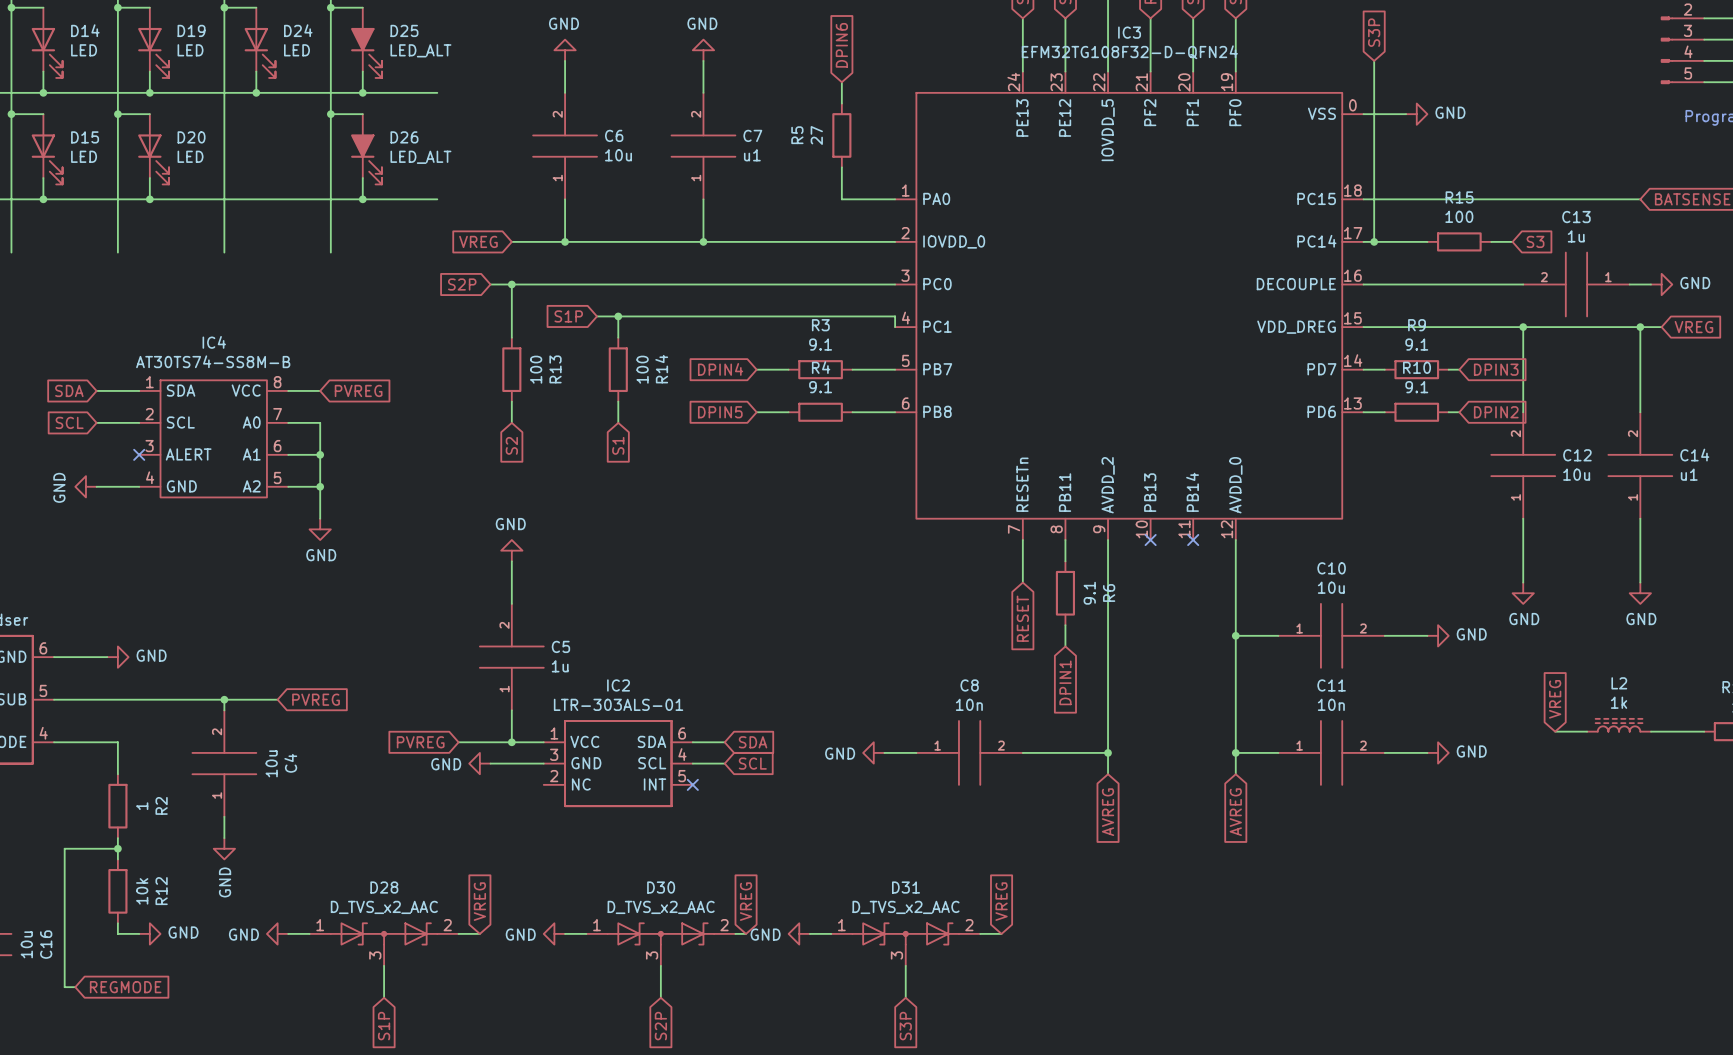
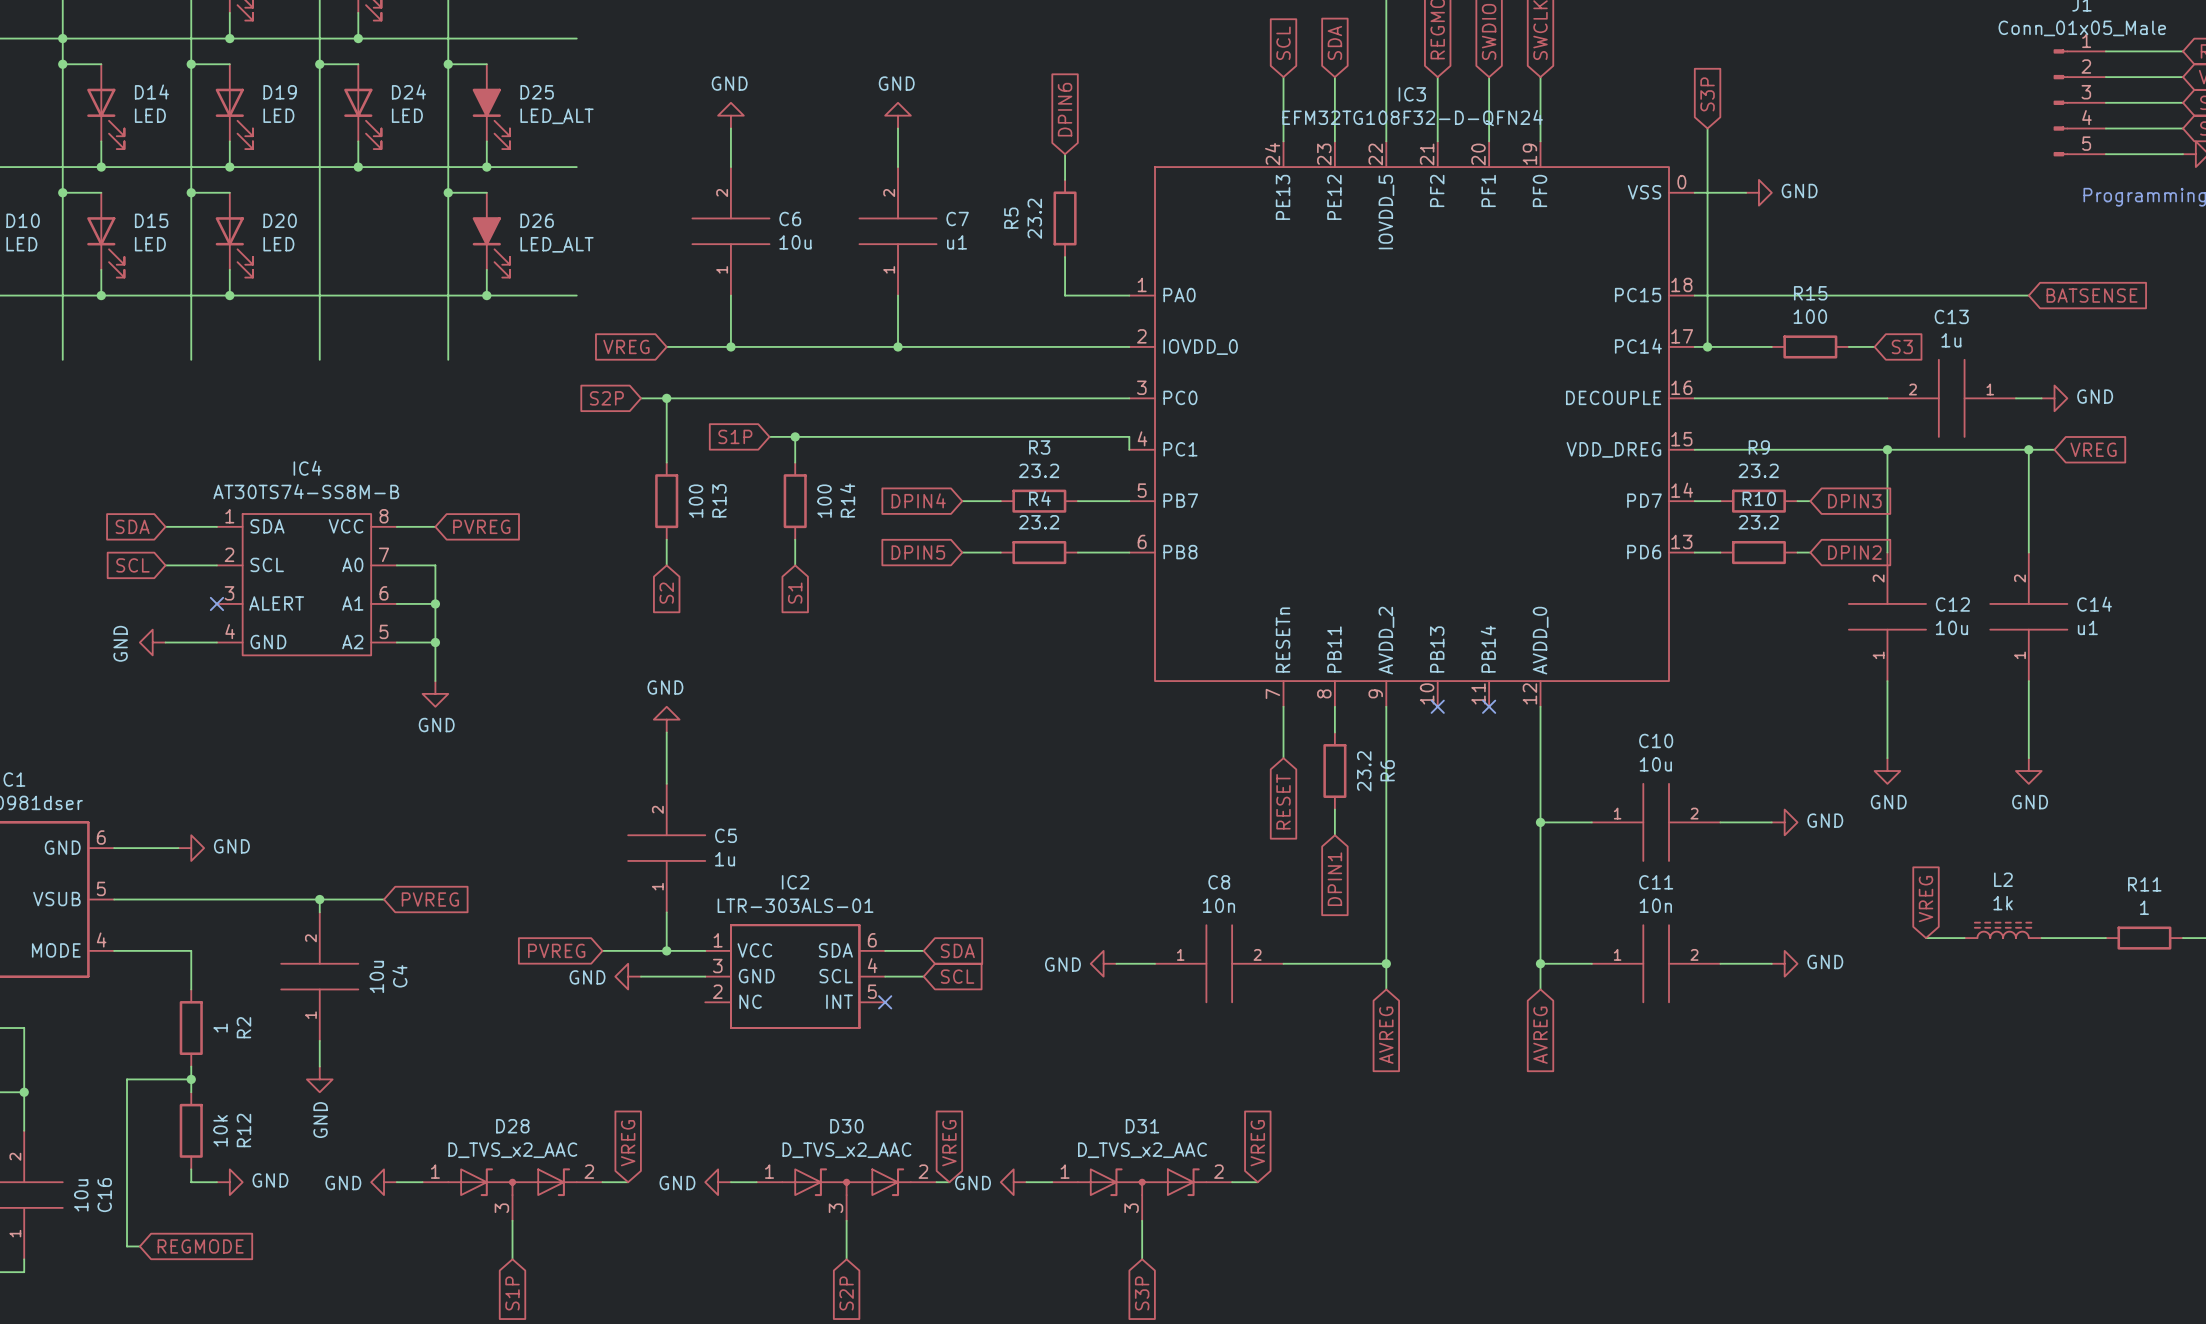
R5 value: 27 (816, 135) -> 23.2 (1034, 218)
R3 value: 9.1 (820, 344) -> 23.2 (1039, 470)
R9 value: 9.1 (1416, 344) -> 23.2 (1758, 470)
R4 value: 9.1 (820, 387) -> 23.2 (1039, 522)
R10 value: 9.1 (1416, 387) -> 23.2 (1758, 522)
R6 value: 9.1 (1089, 593) -> 23.2 (1364, 771)

